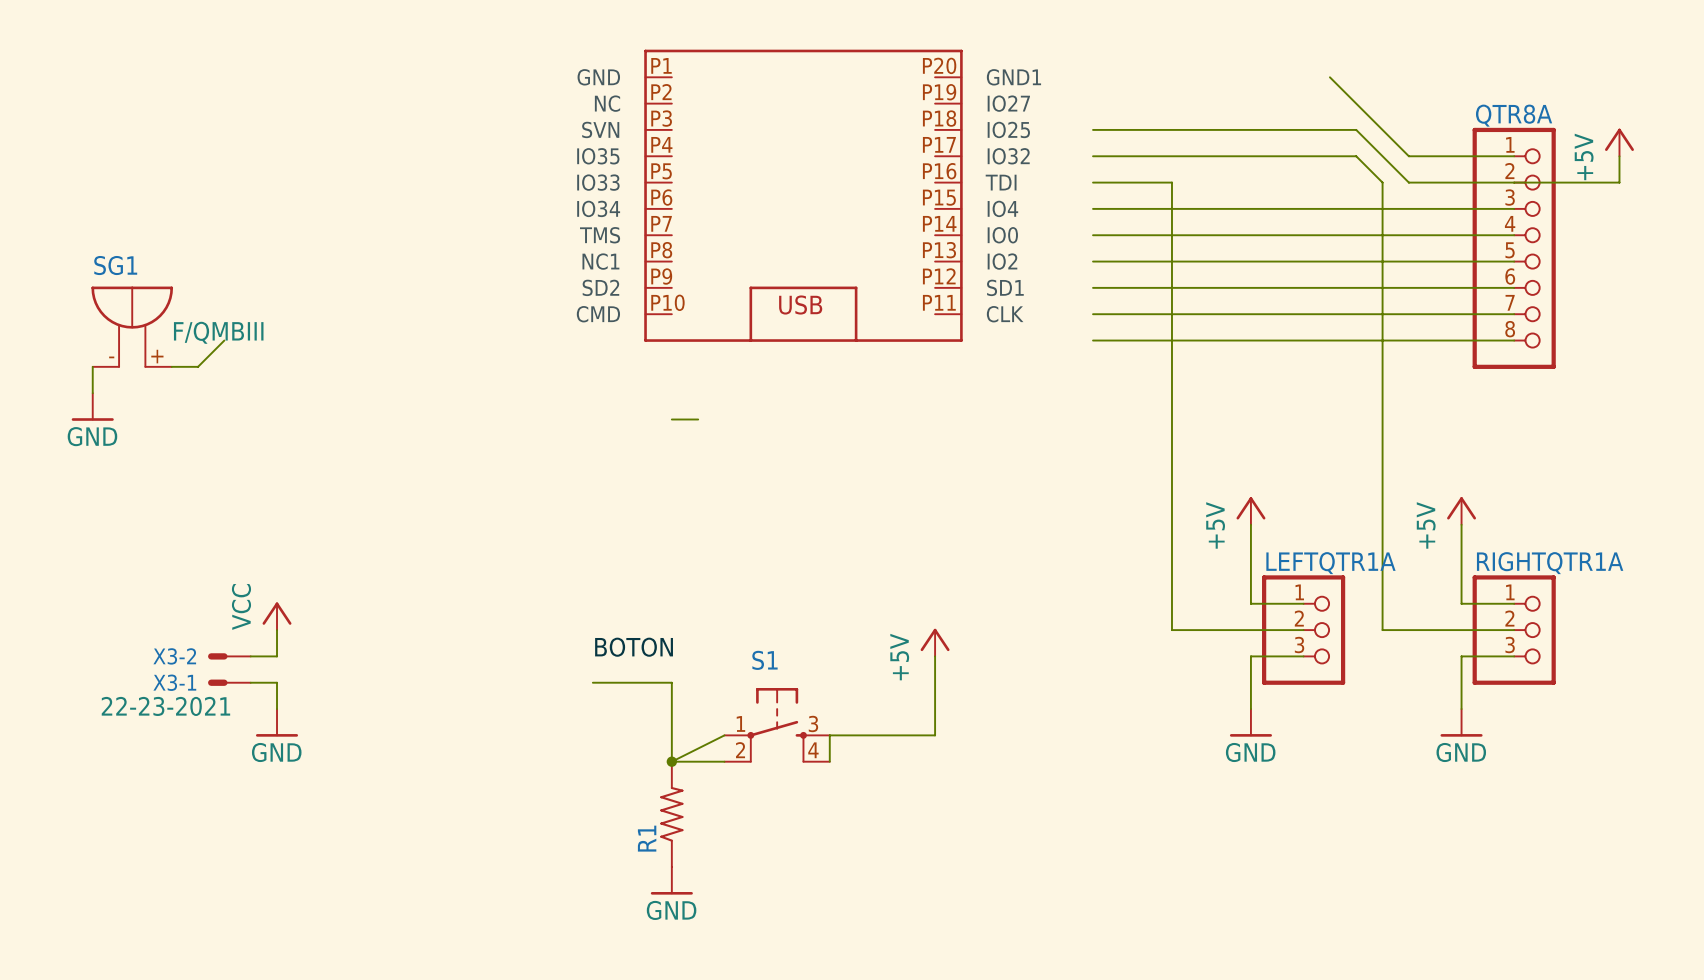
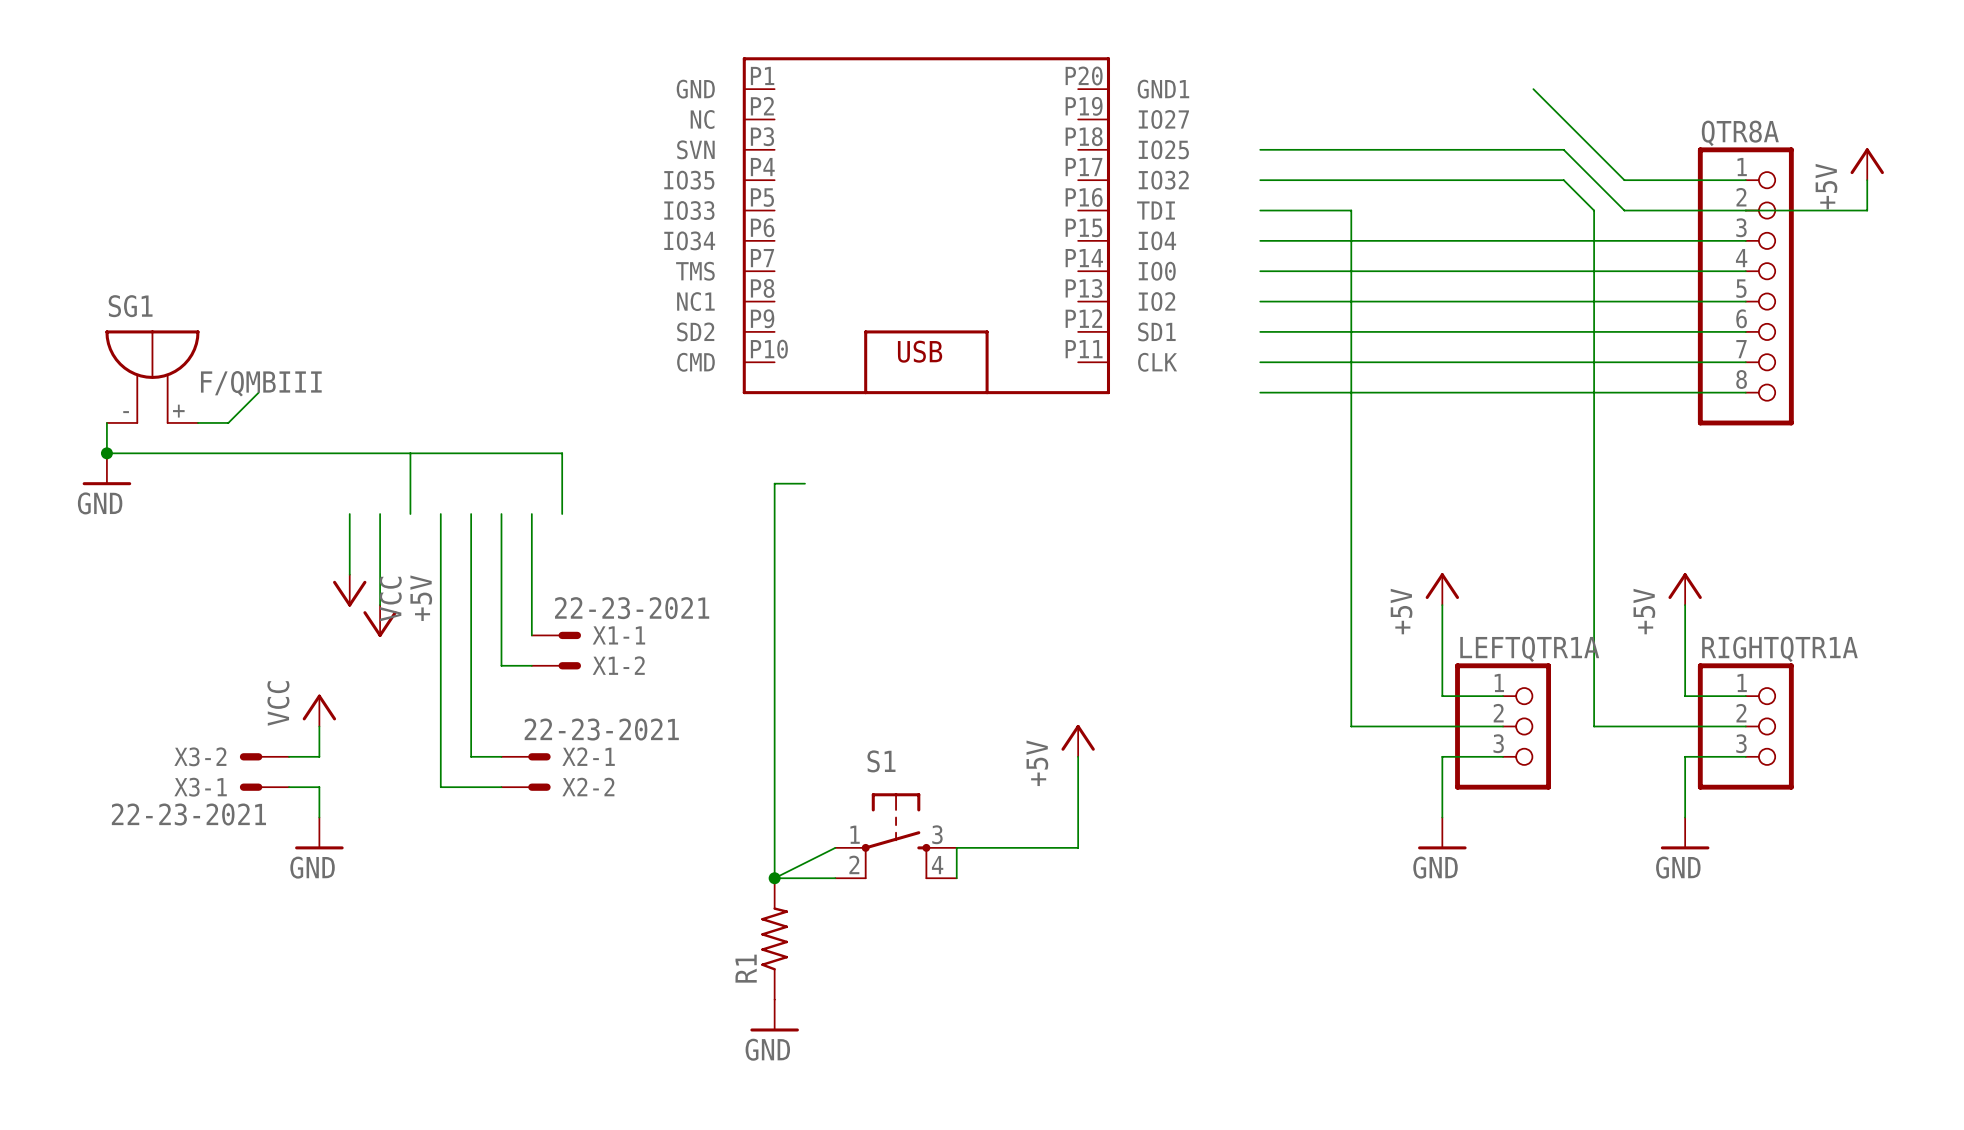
wire: none -> (106, 453) (562, 453) (562, 514)
junction: none -> (106, 453)
wire: none -> (410, 453) (410, 514)
wire: none -> (349, 514) (349, 574)
wire: none -> (380, 514) (380, 605)
wire: none -> (440, 514) (440, 787) (501, 787)
wire: none -> (471, 514) (471, 756) (501, 756)
wire: none -> (501, 514) (501, 665) (531, 665)
wire: none -> (531, 514) (531, 635)
power symbol: none -> VCC (349, 590)
power symbol: none -> +5V (380, 621)
X1-1: none -> 22-23-2021 (556, 635)
X1-2: none -> (556, 665)
label: BOTON (634, 647) -> none
X2-1: none -> 22-23-2021 (526, 756)
X2-2: none -> (526, 787)
wire: (592, 682) (671, 682) -> (774, 483) (774, 787)

